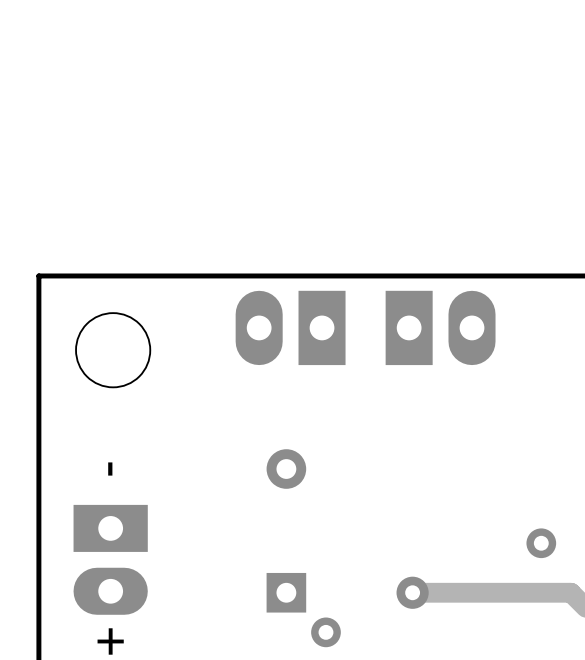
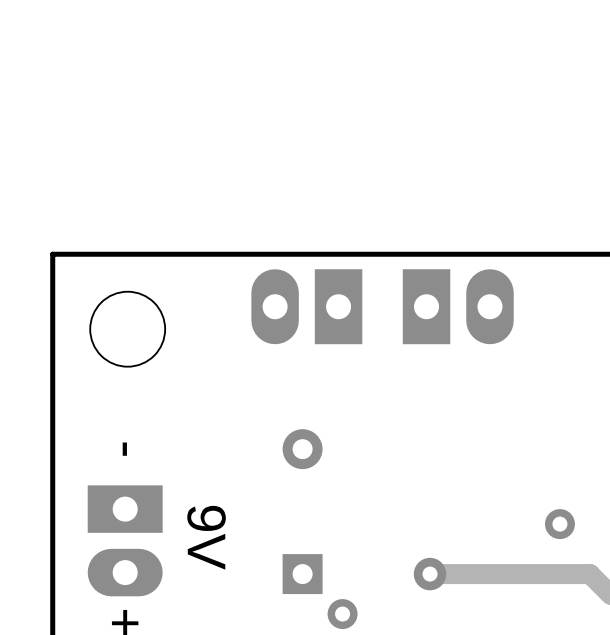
text: none -> 9V (206, 537)

